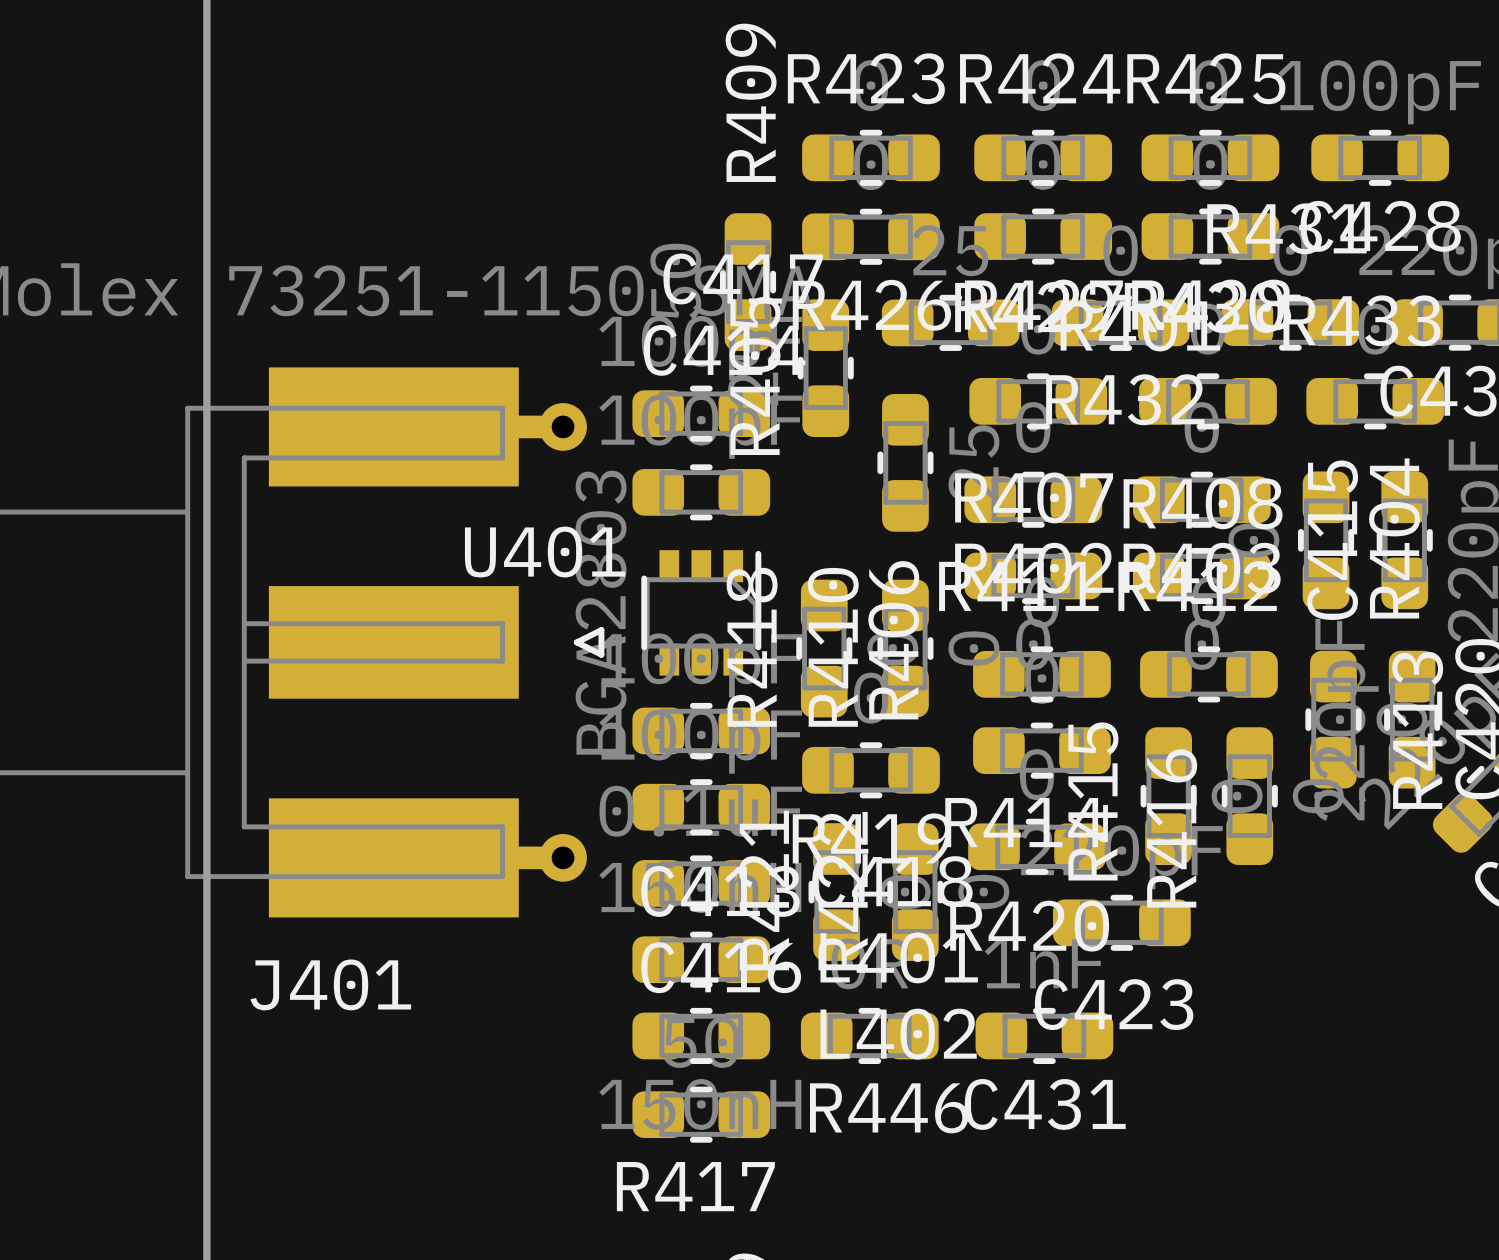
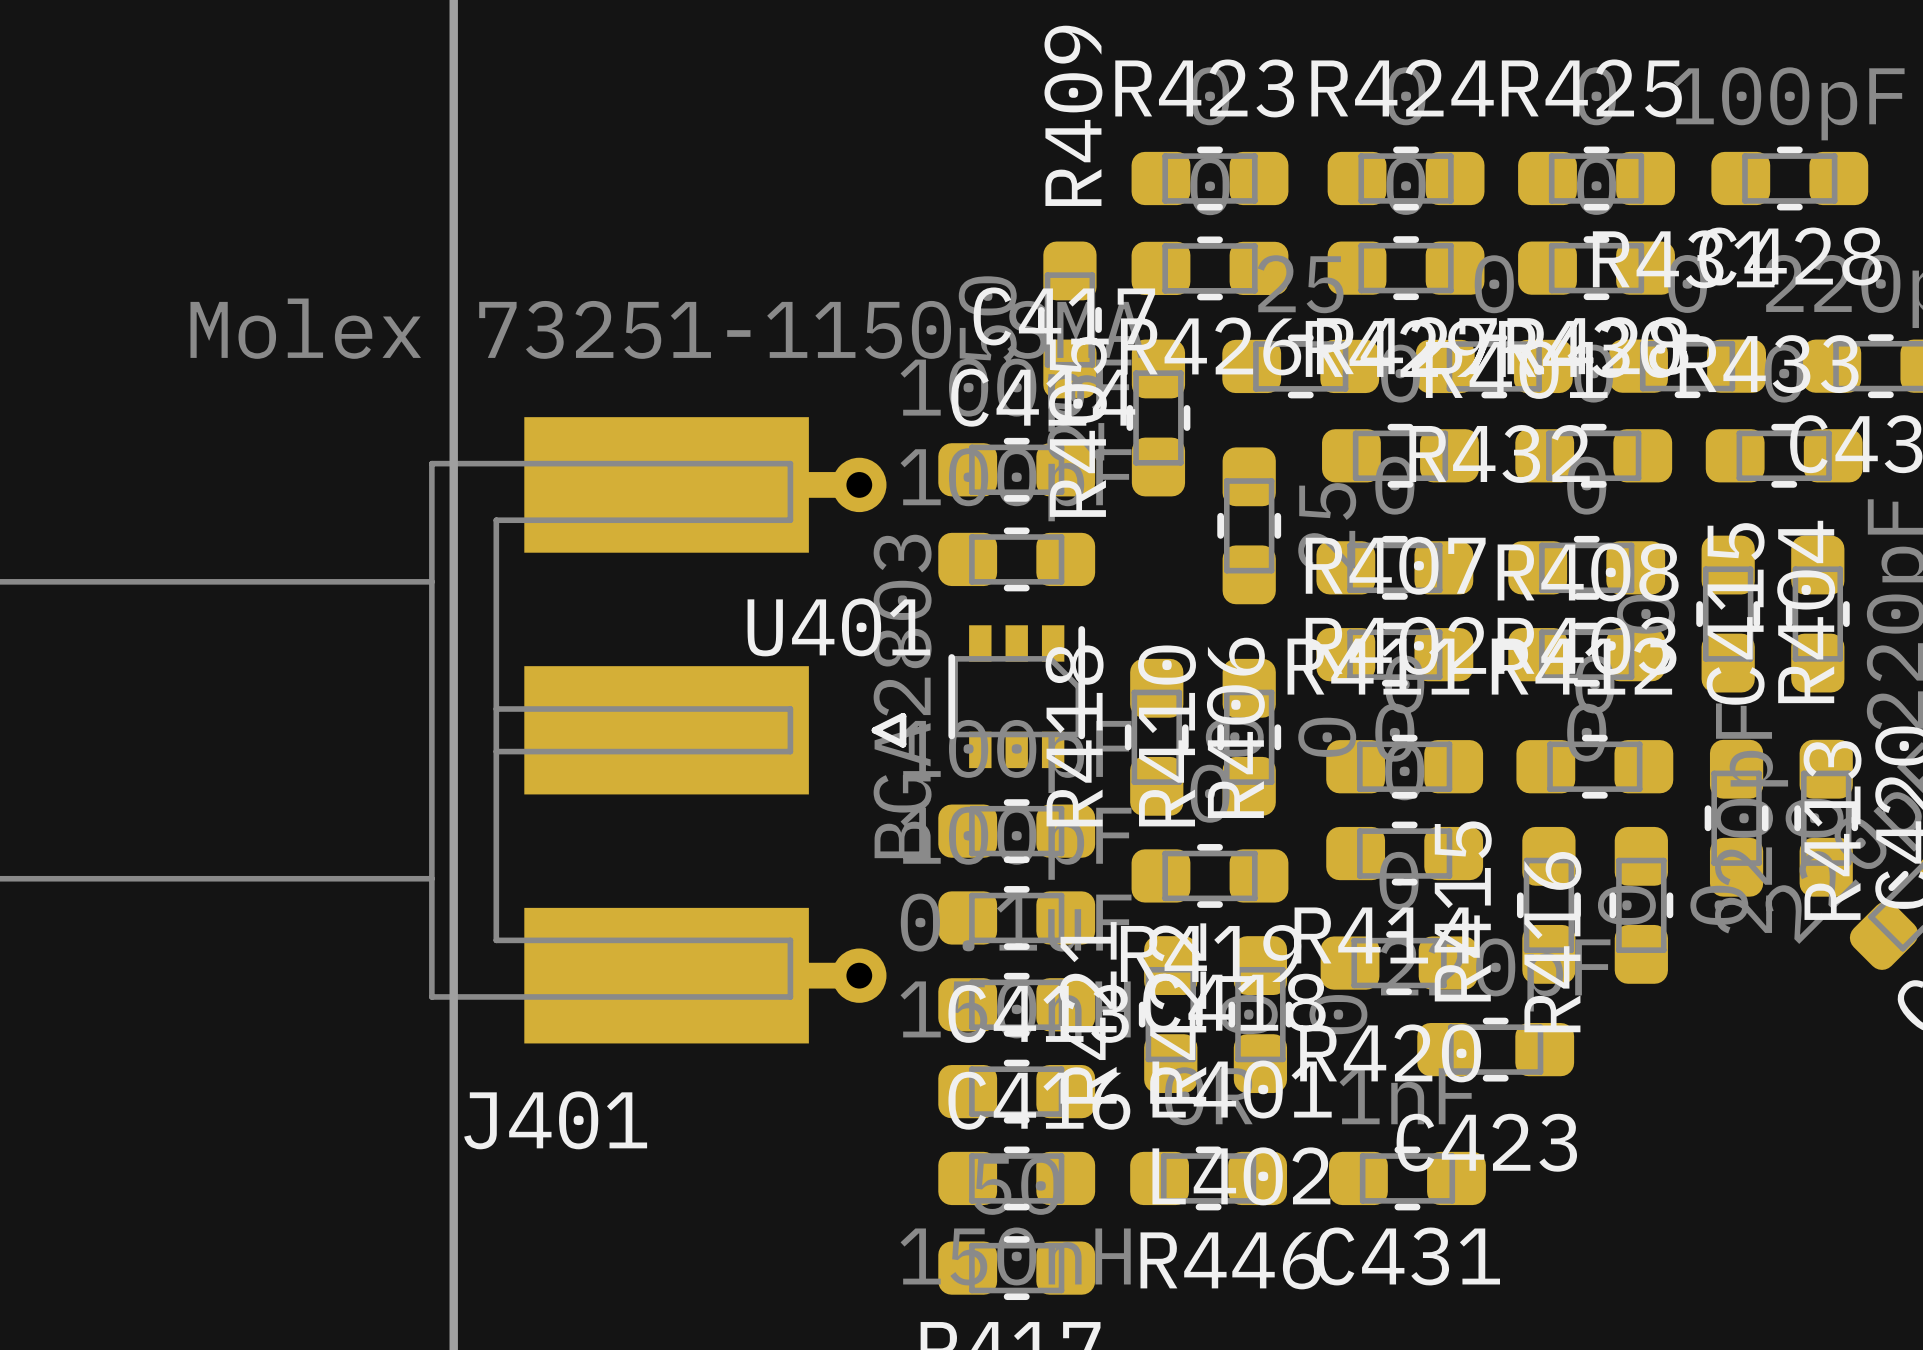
J401 name position: J401 (330, 984) -> J401 (555, 1120)

